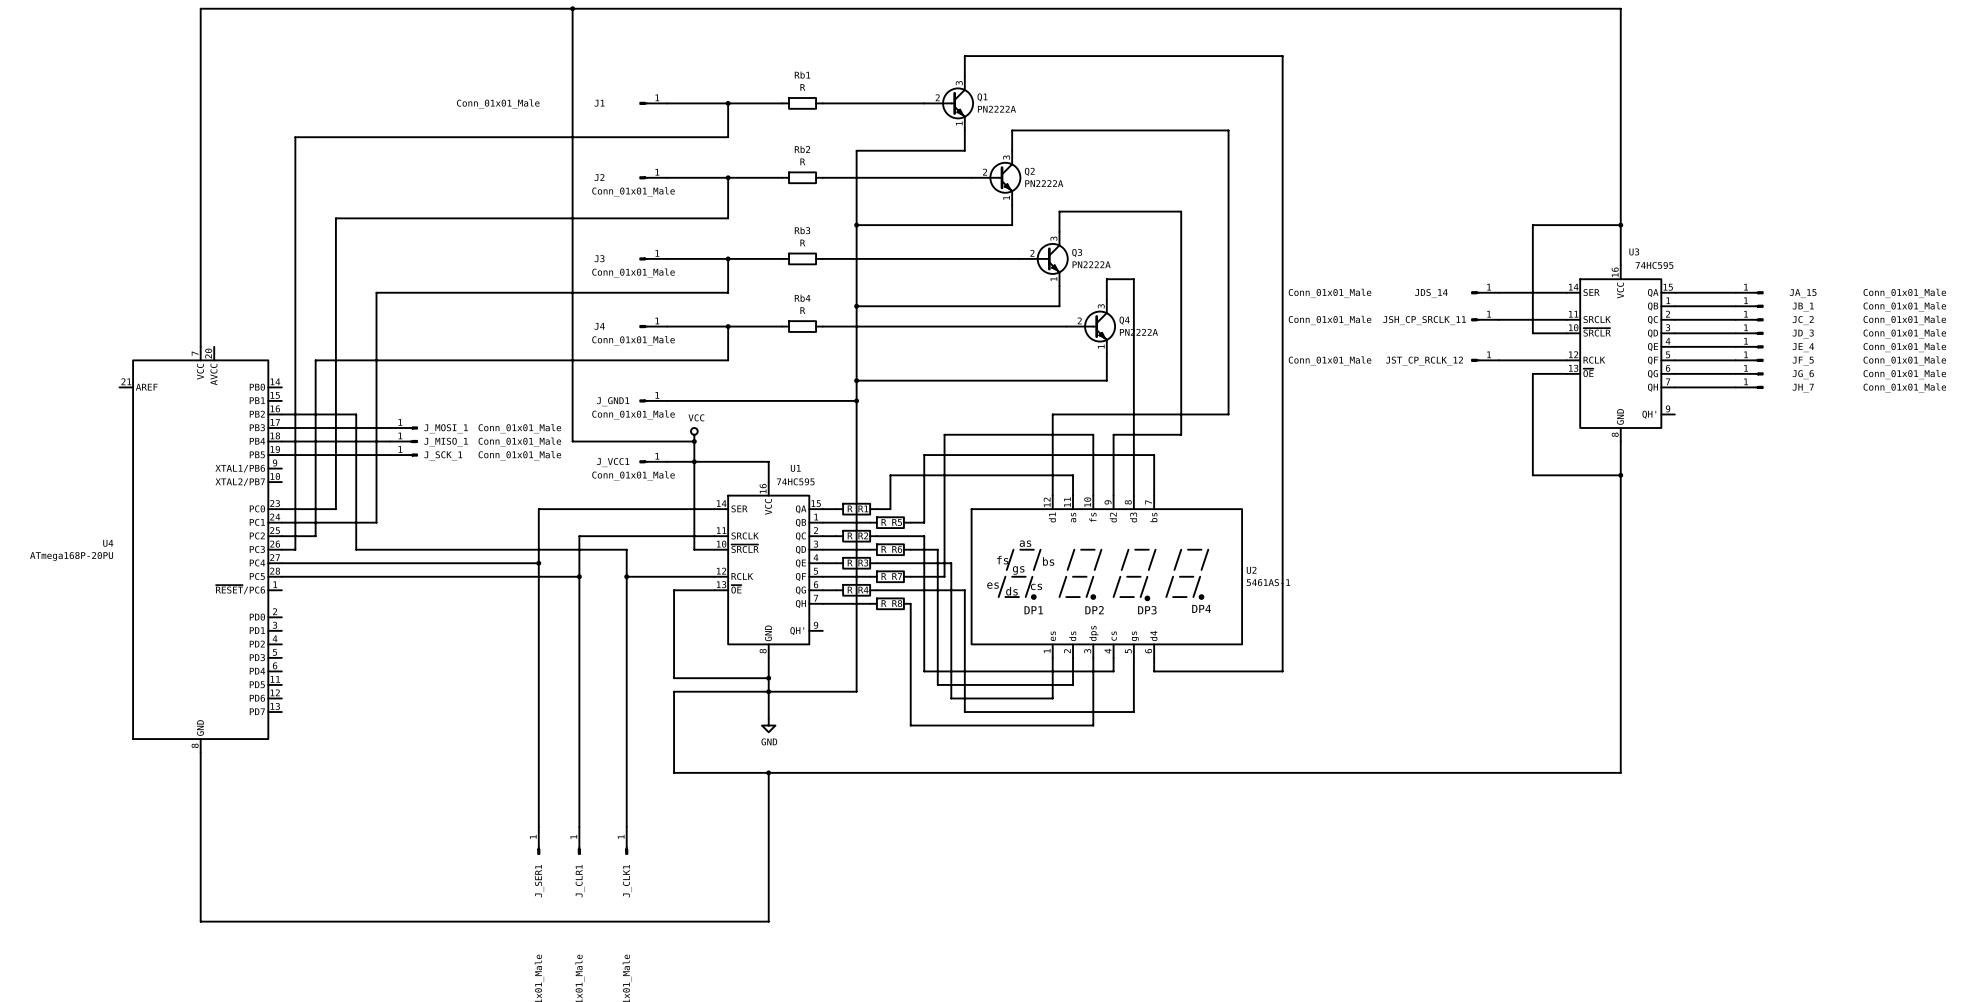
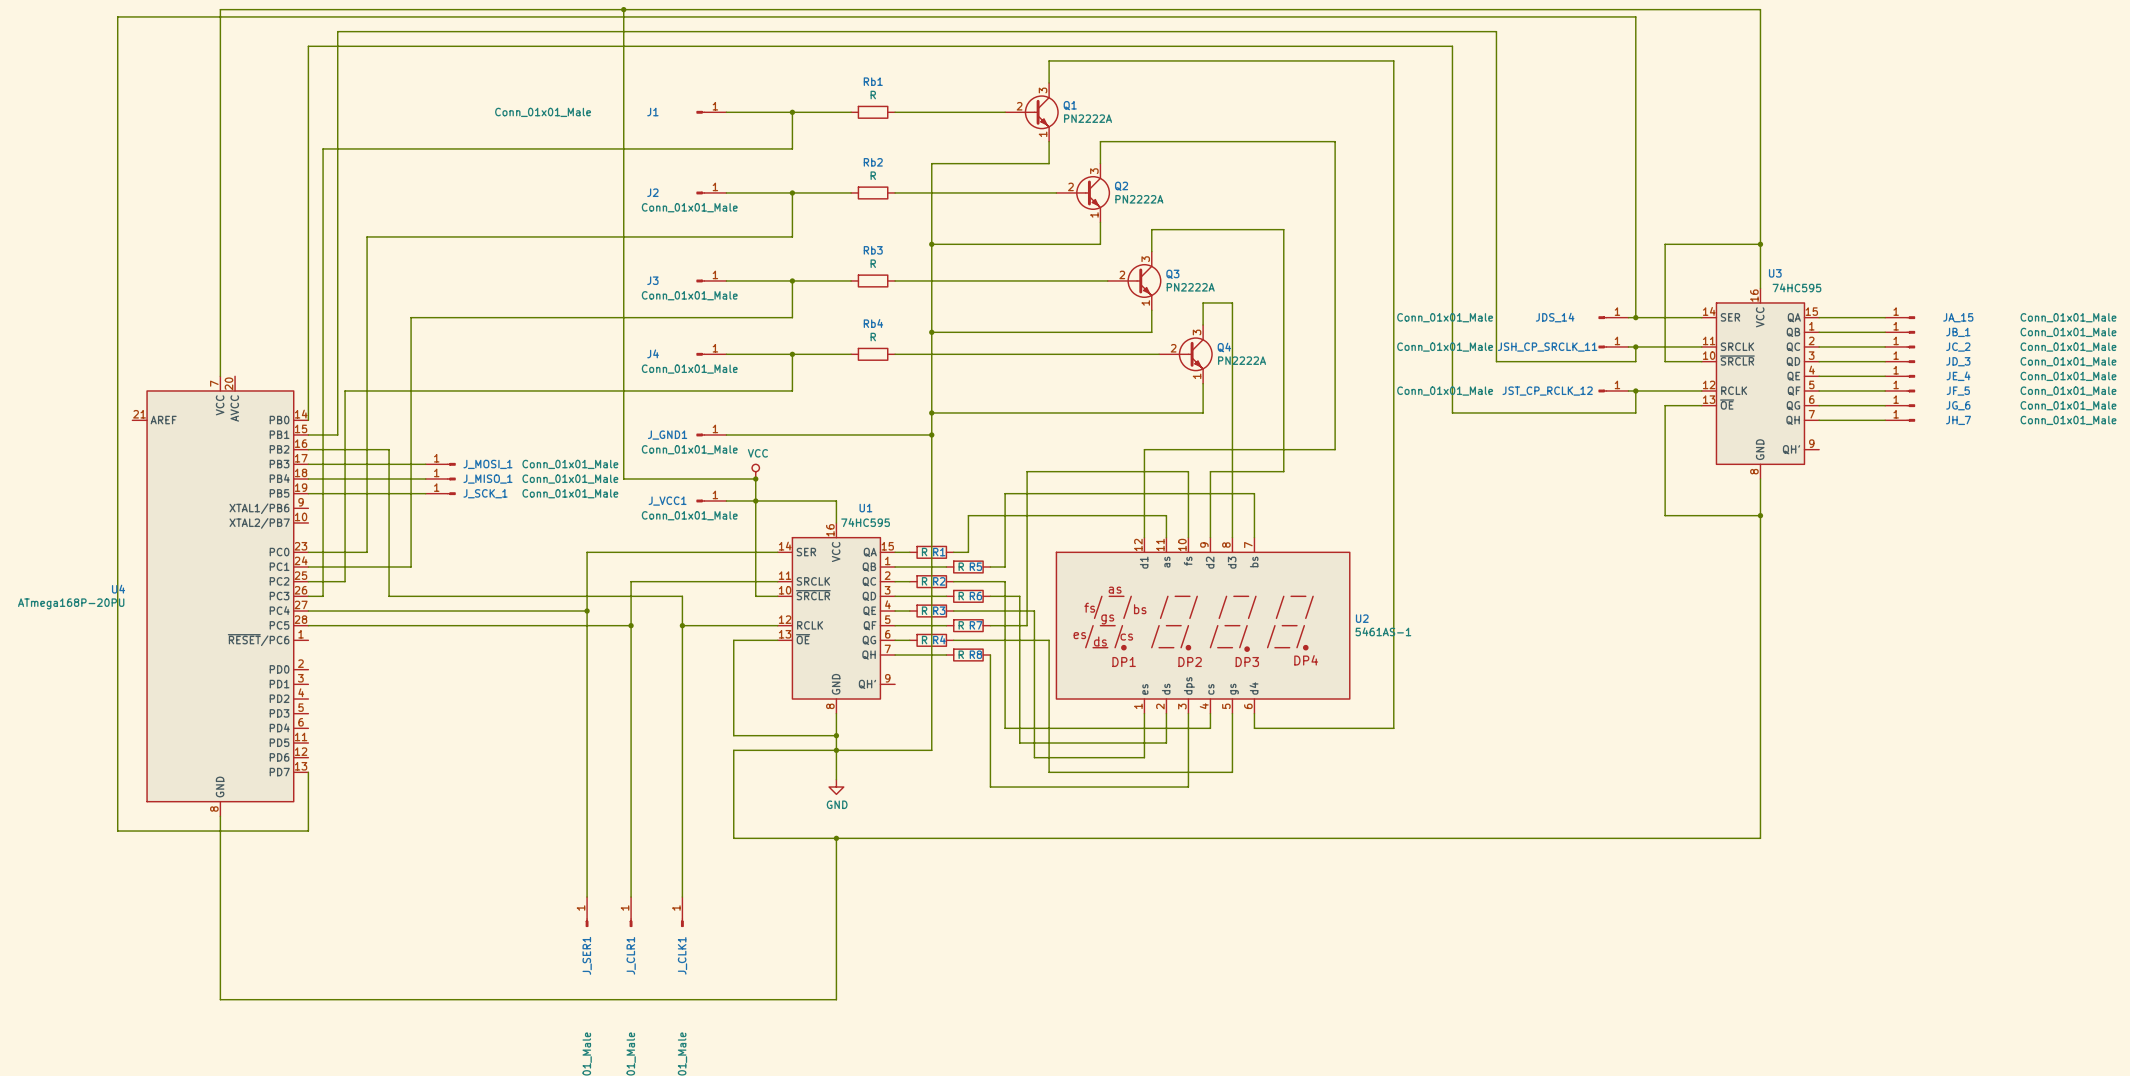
wire: none -> (1635, 317) (1635, 16) (117, 16) (117, 831) (308, 831) (308, 772)
junction: none -> (1635, 317)
wire: none -> (1635, 346) (1635, 361) (1496, 361) (1496, 31) (337, 31) (337, 434) (308, 434)
junction: none -> (1635, 346)
wire: none -> (1635, 390) (1635, 412) (1452, 412) (1452, 46) (308, 46) (308, 420)
junction: none -> (1635, 390)

